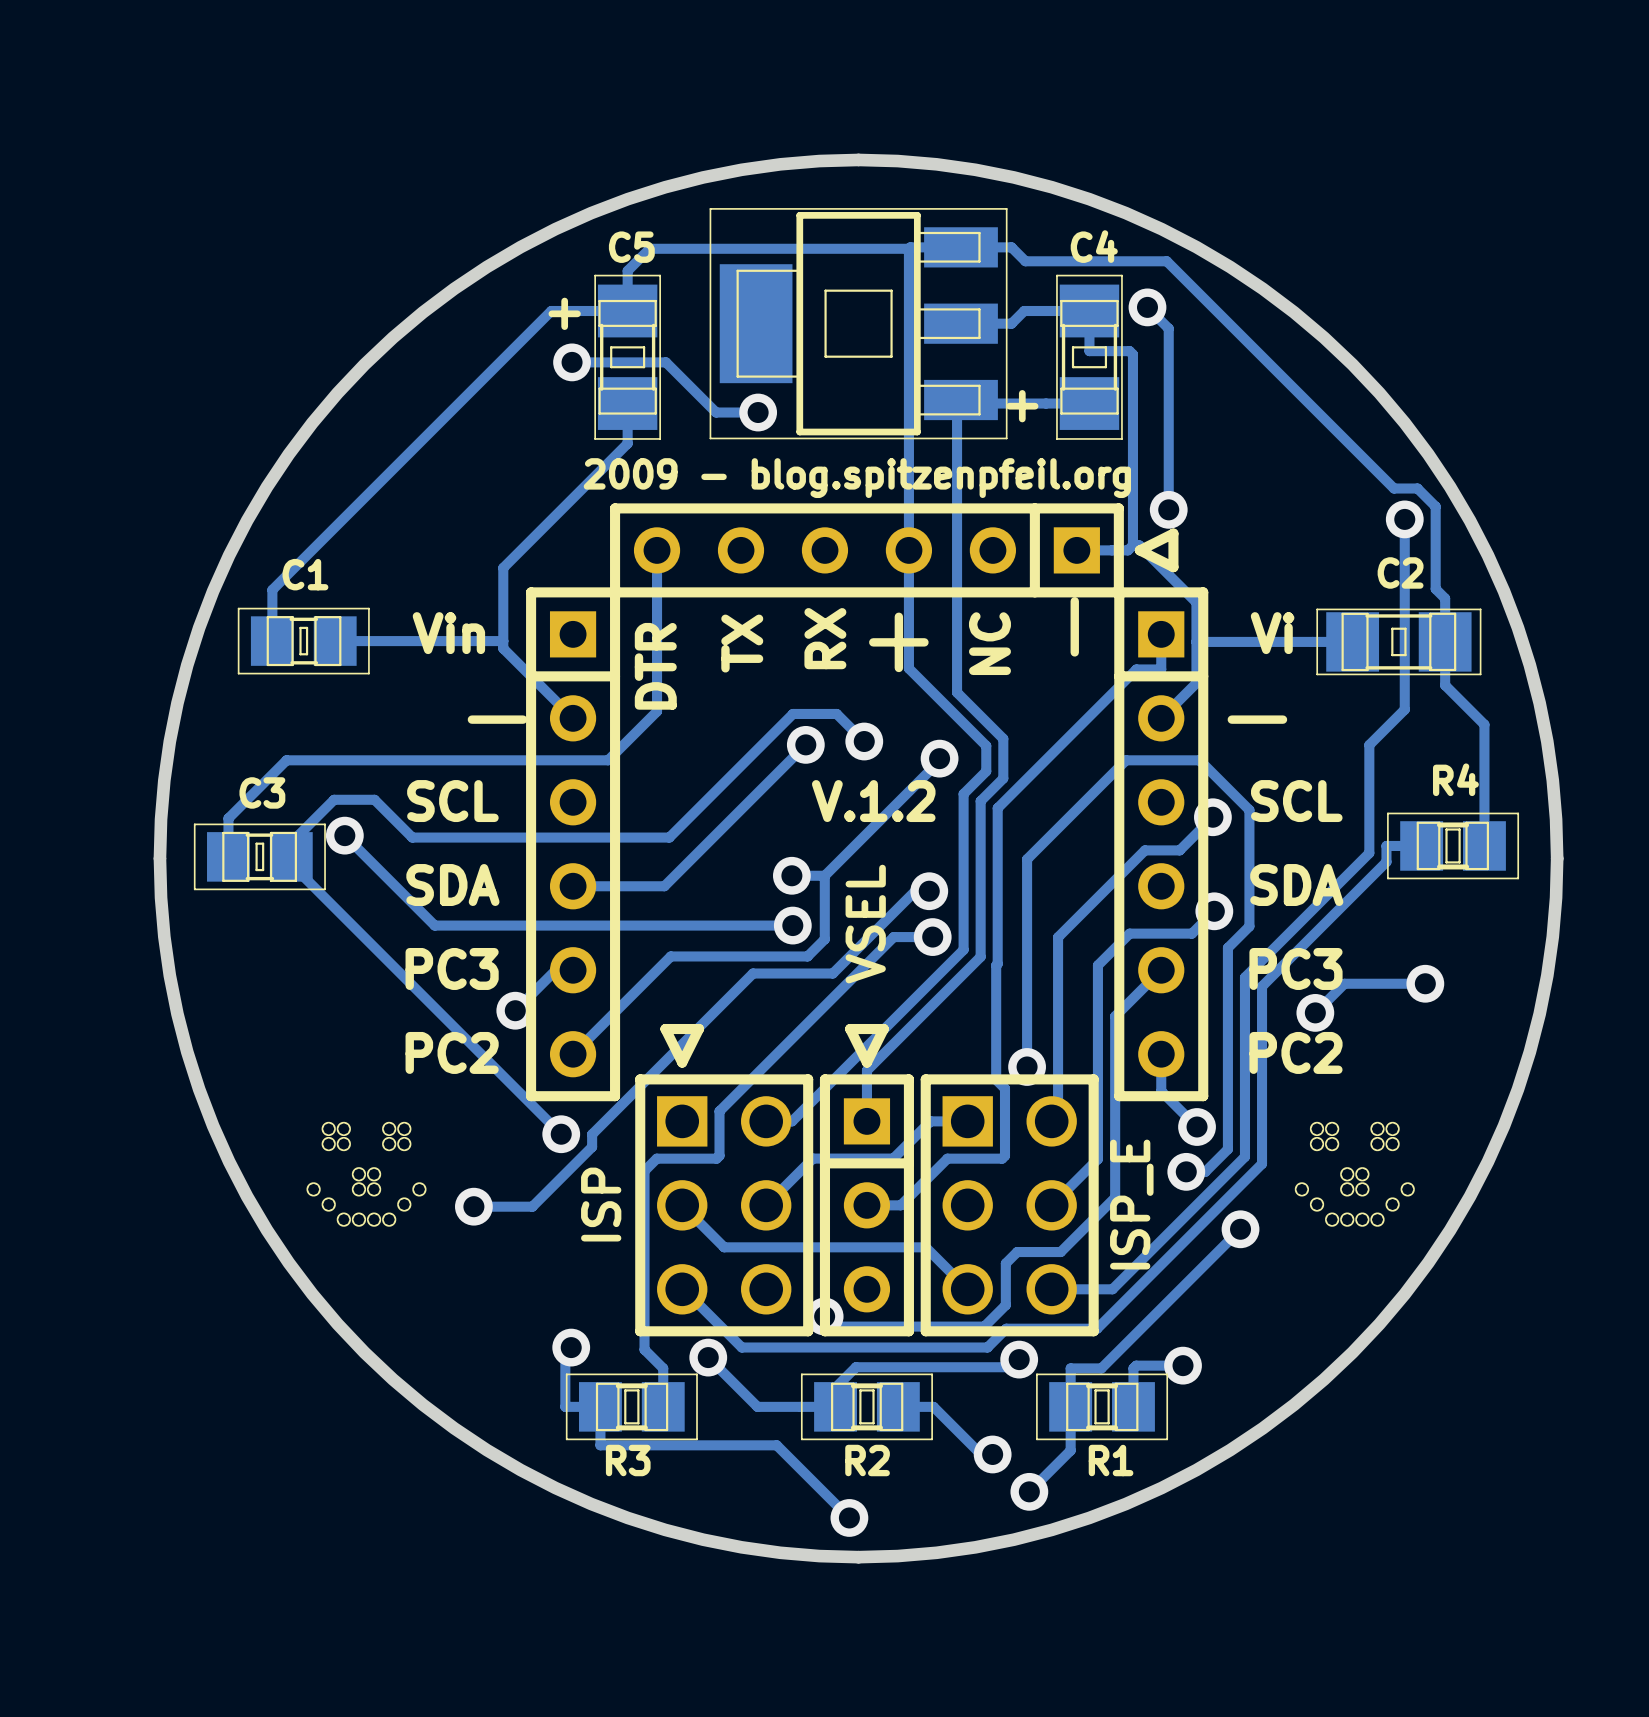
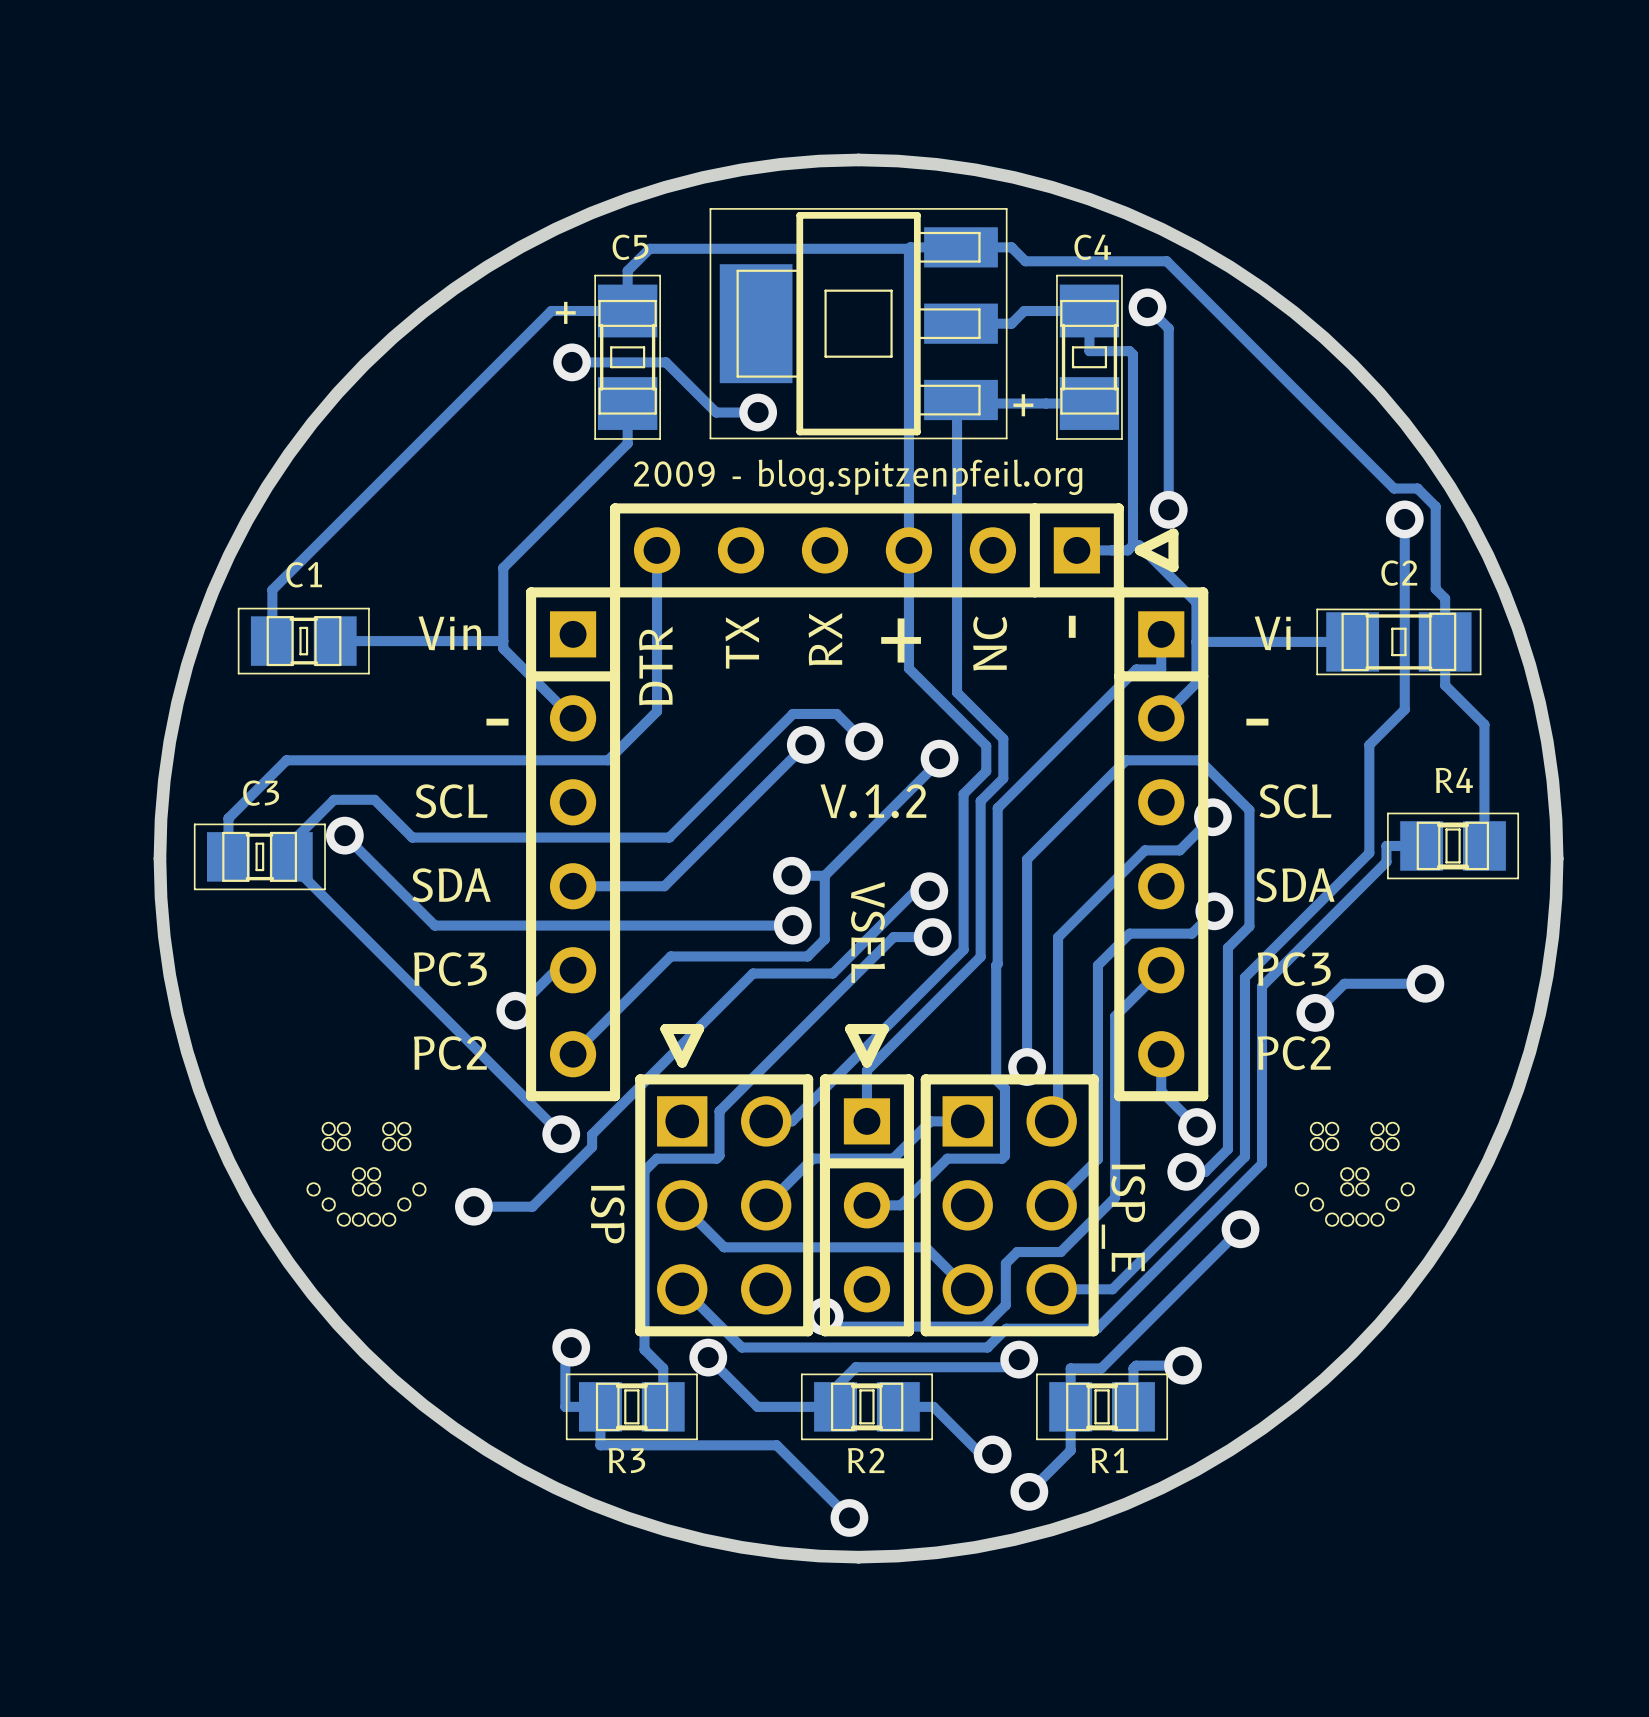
text: VSEL (865, 924) -> none
part value: none -> VSEL (867, 932)
text: ISP (601, 1204) -> none
text: ISP_E (1131, 1204) -> none
part value: none -> ISP (607, 1214)
part value: none -> ISP_E (1123, 1218)

